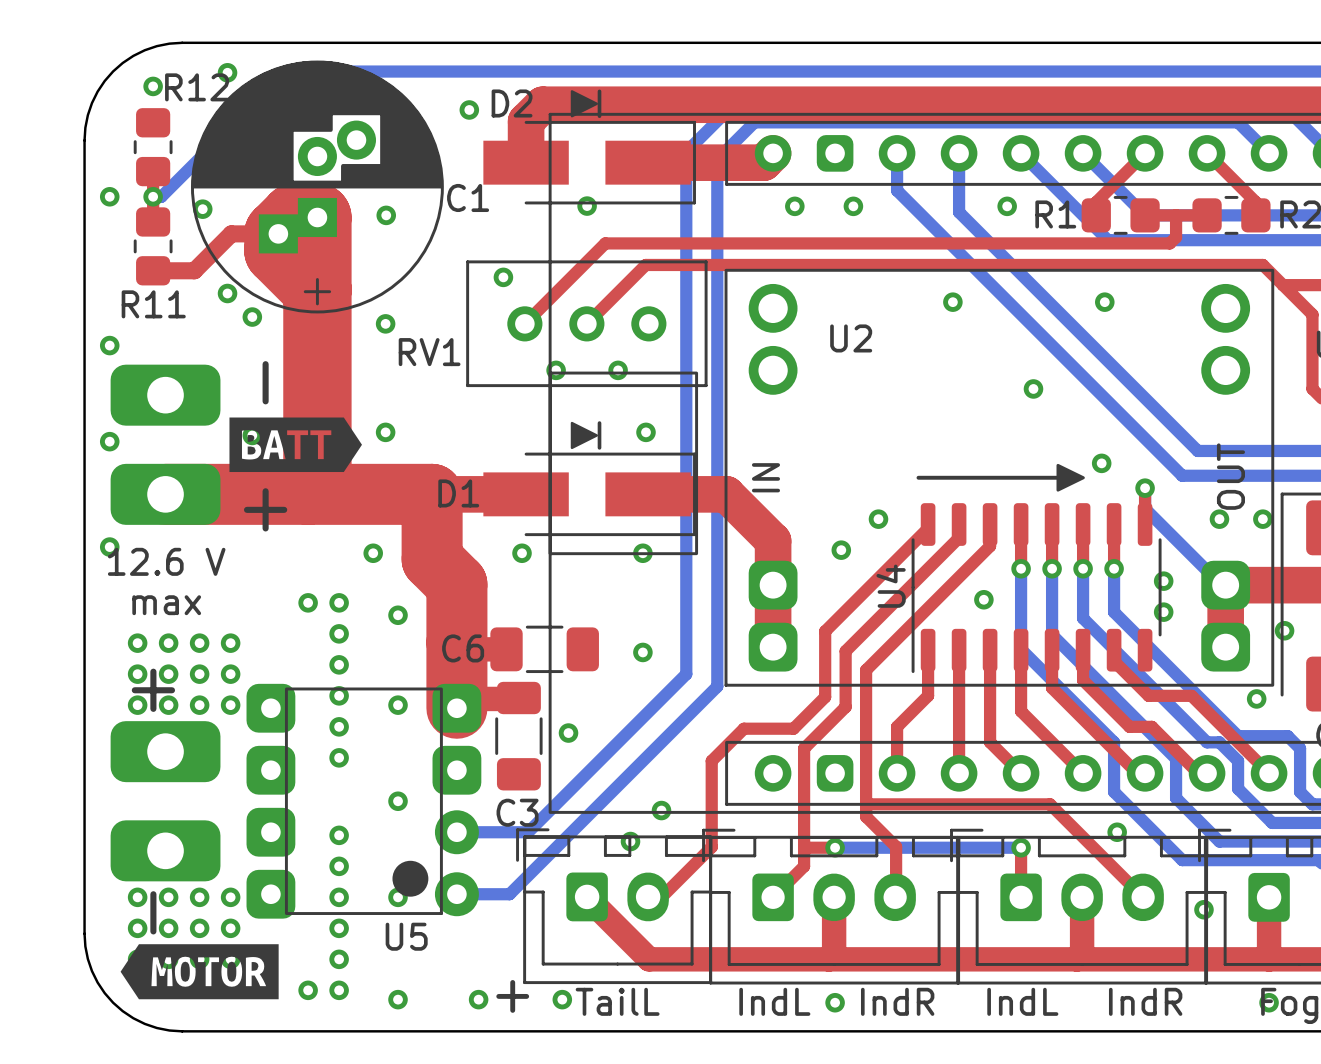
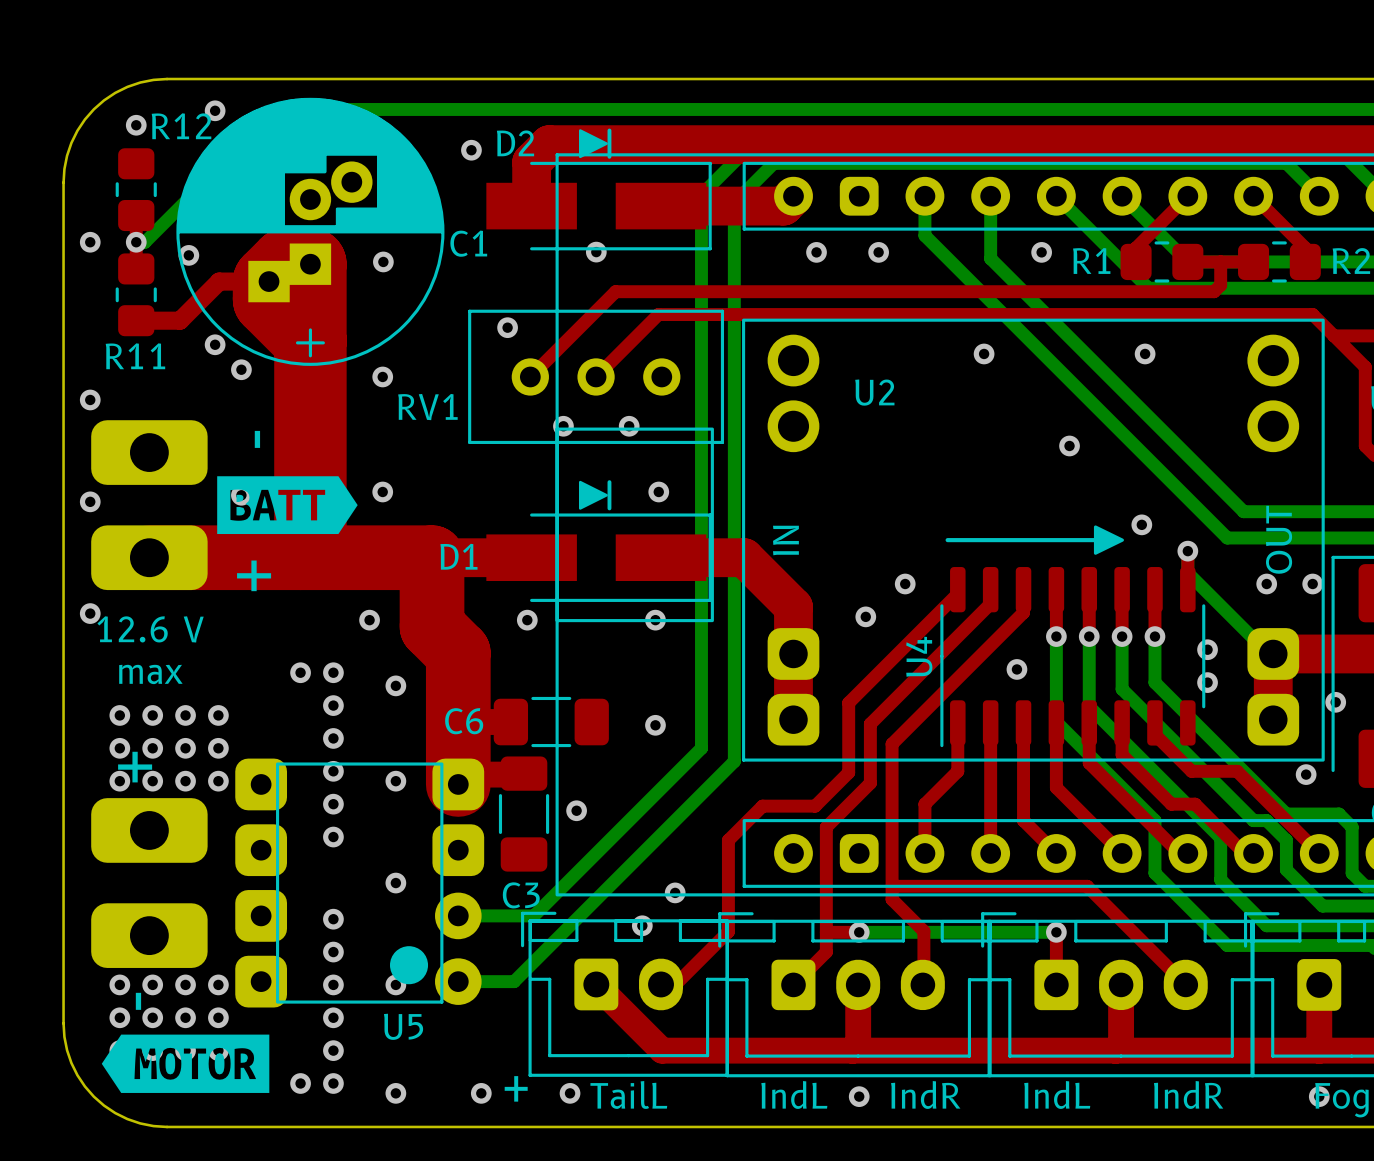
via: (1117, 832) -> none
via: (1203, 909) -> none

